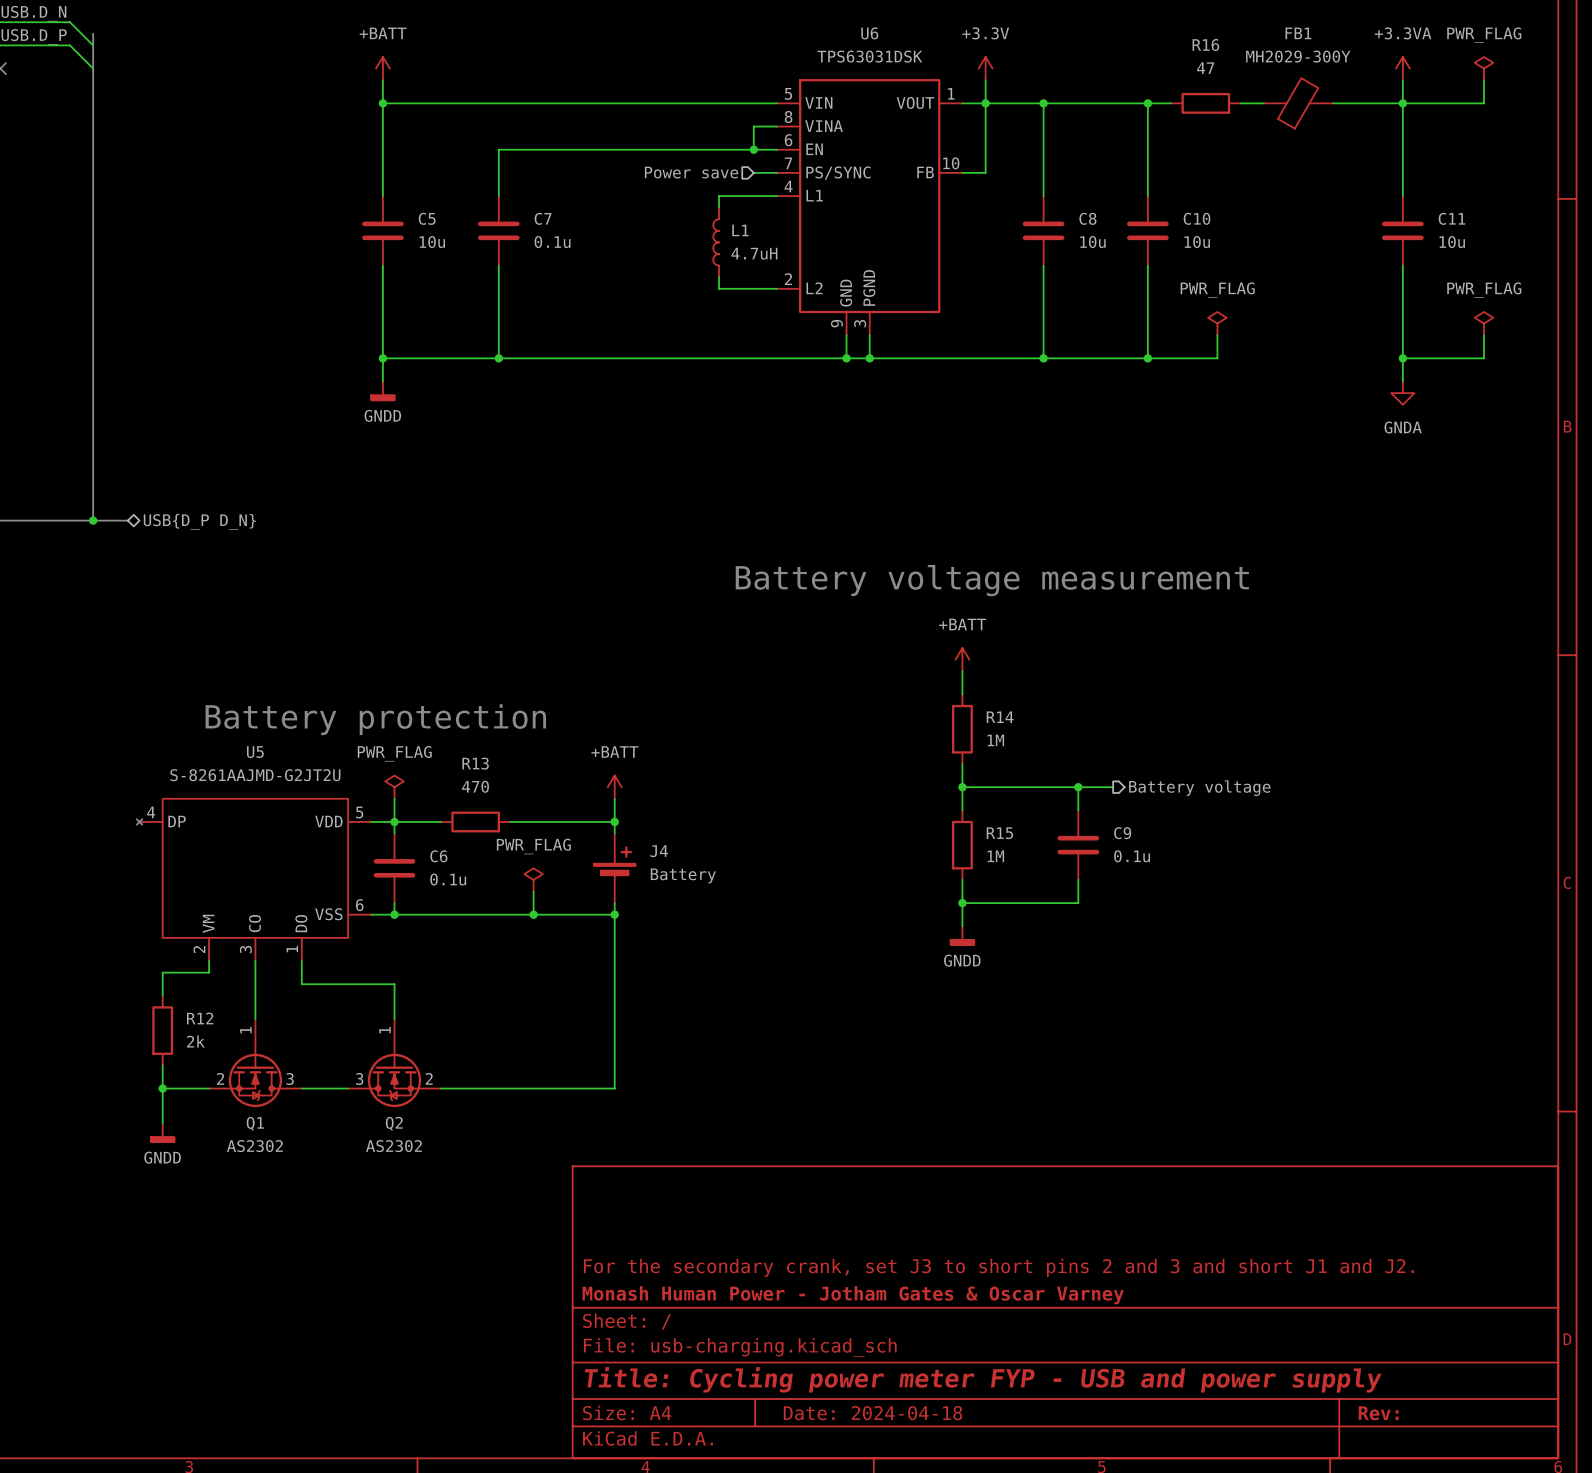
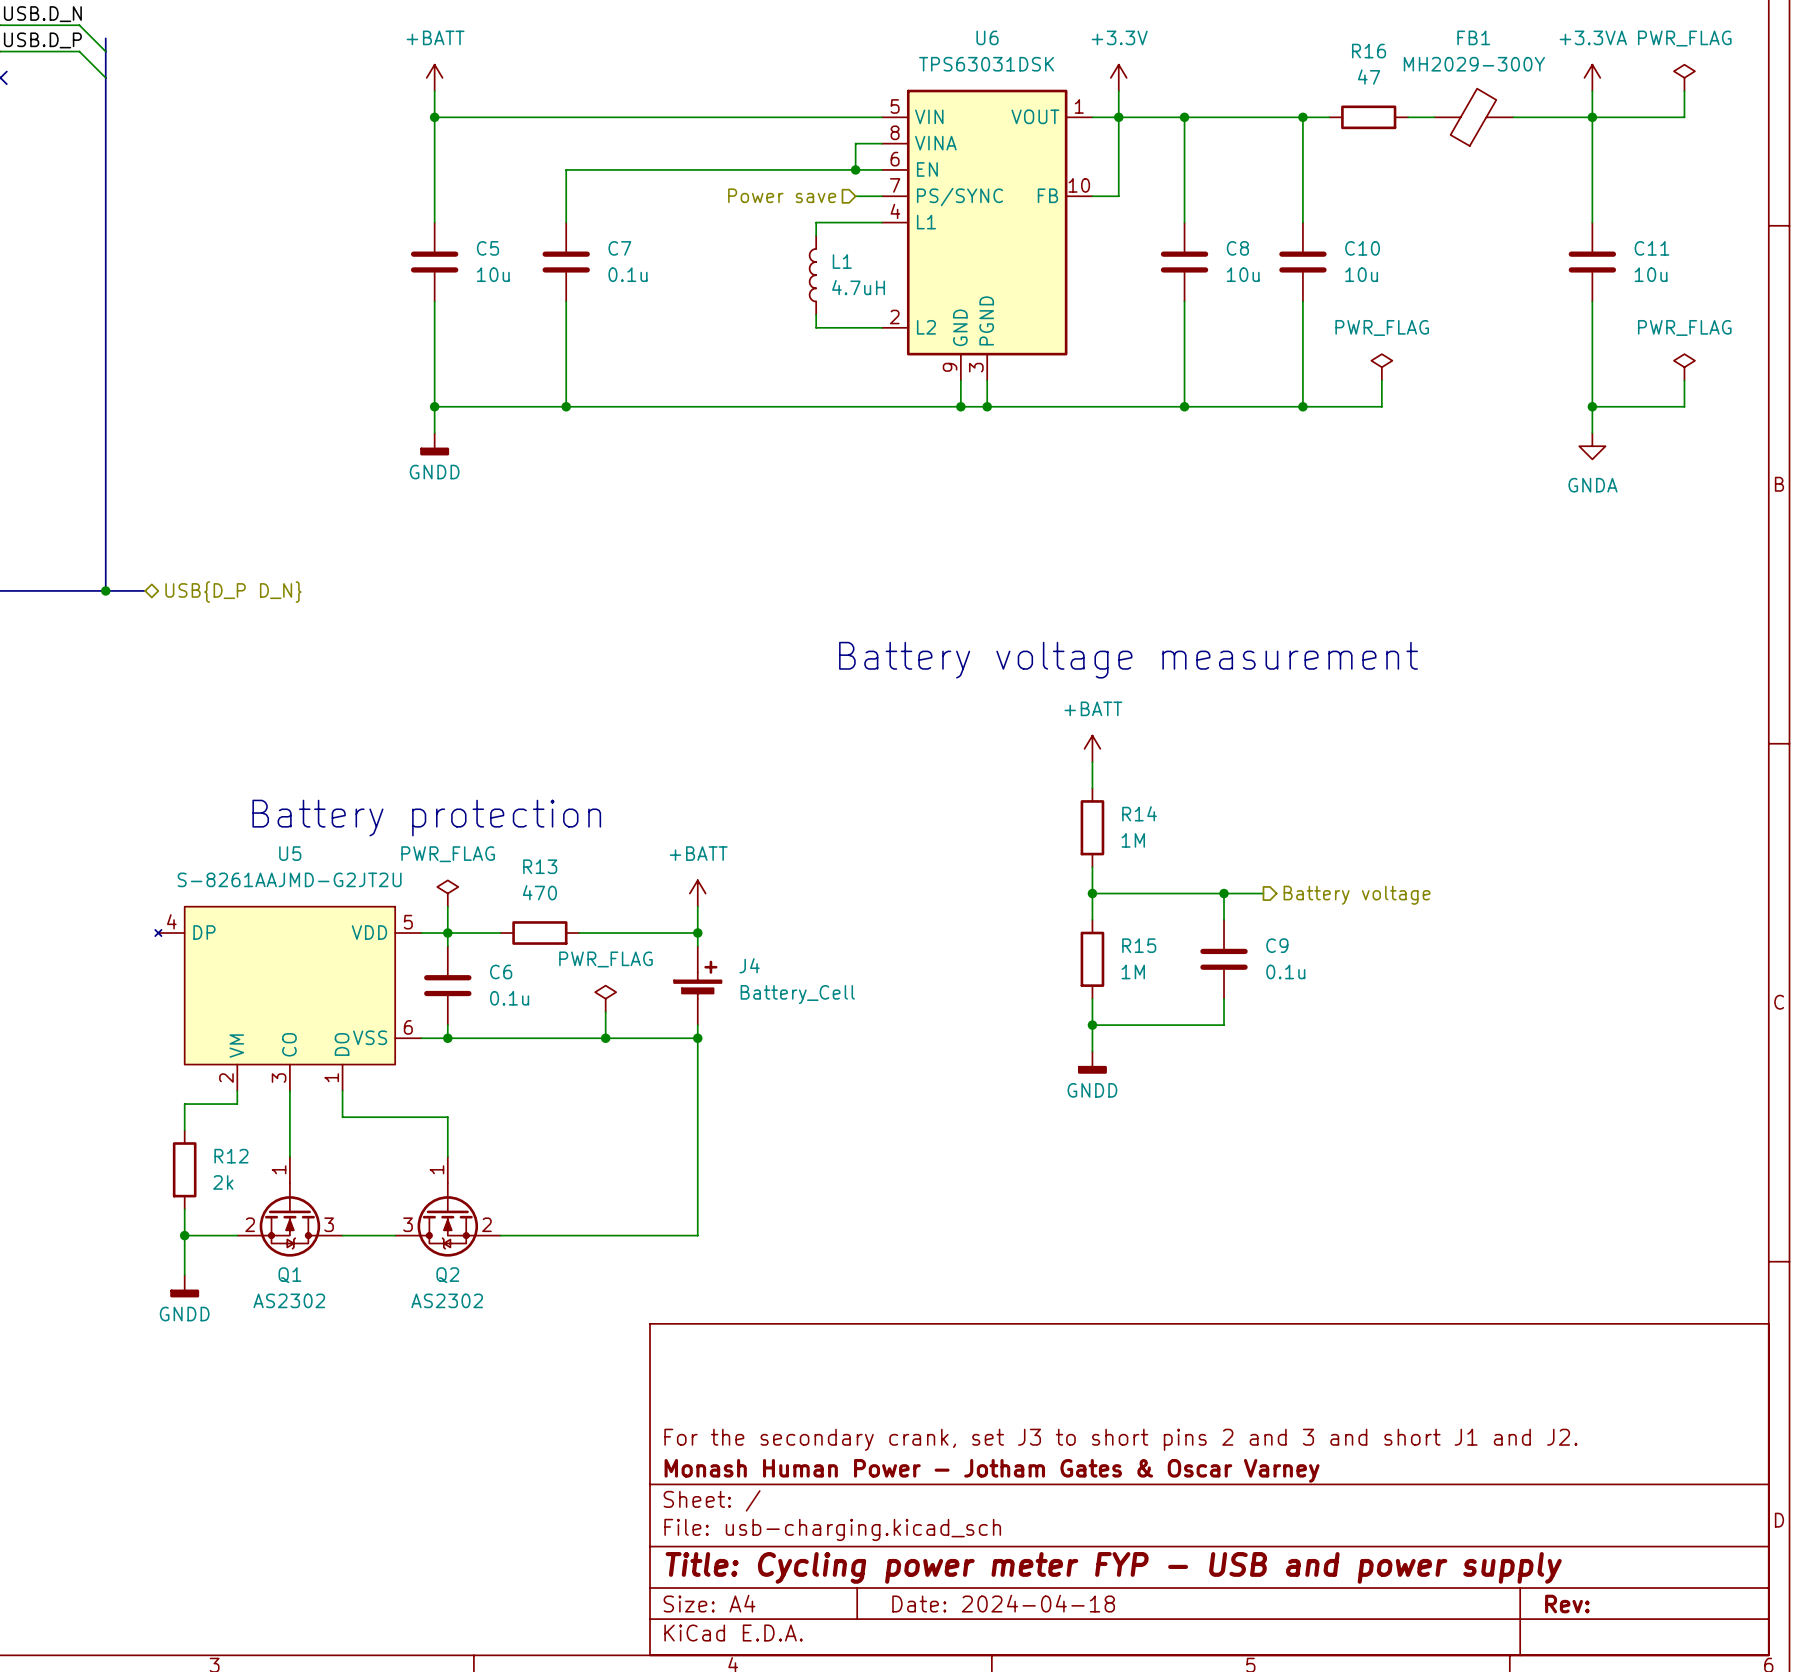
J4 value: Battery (683, 875) -> Battery_Cell (797, 994)

